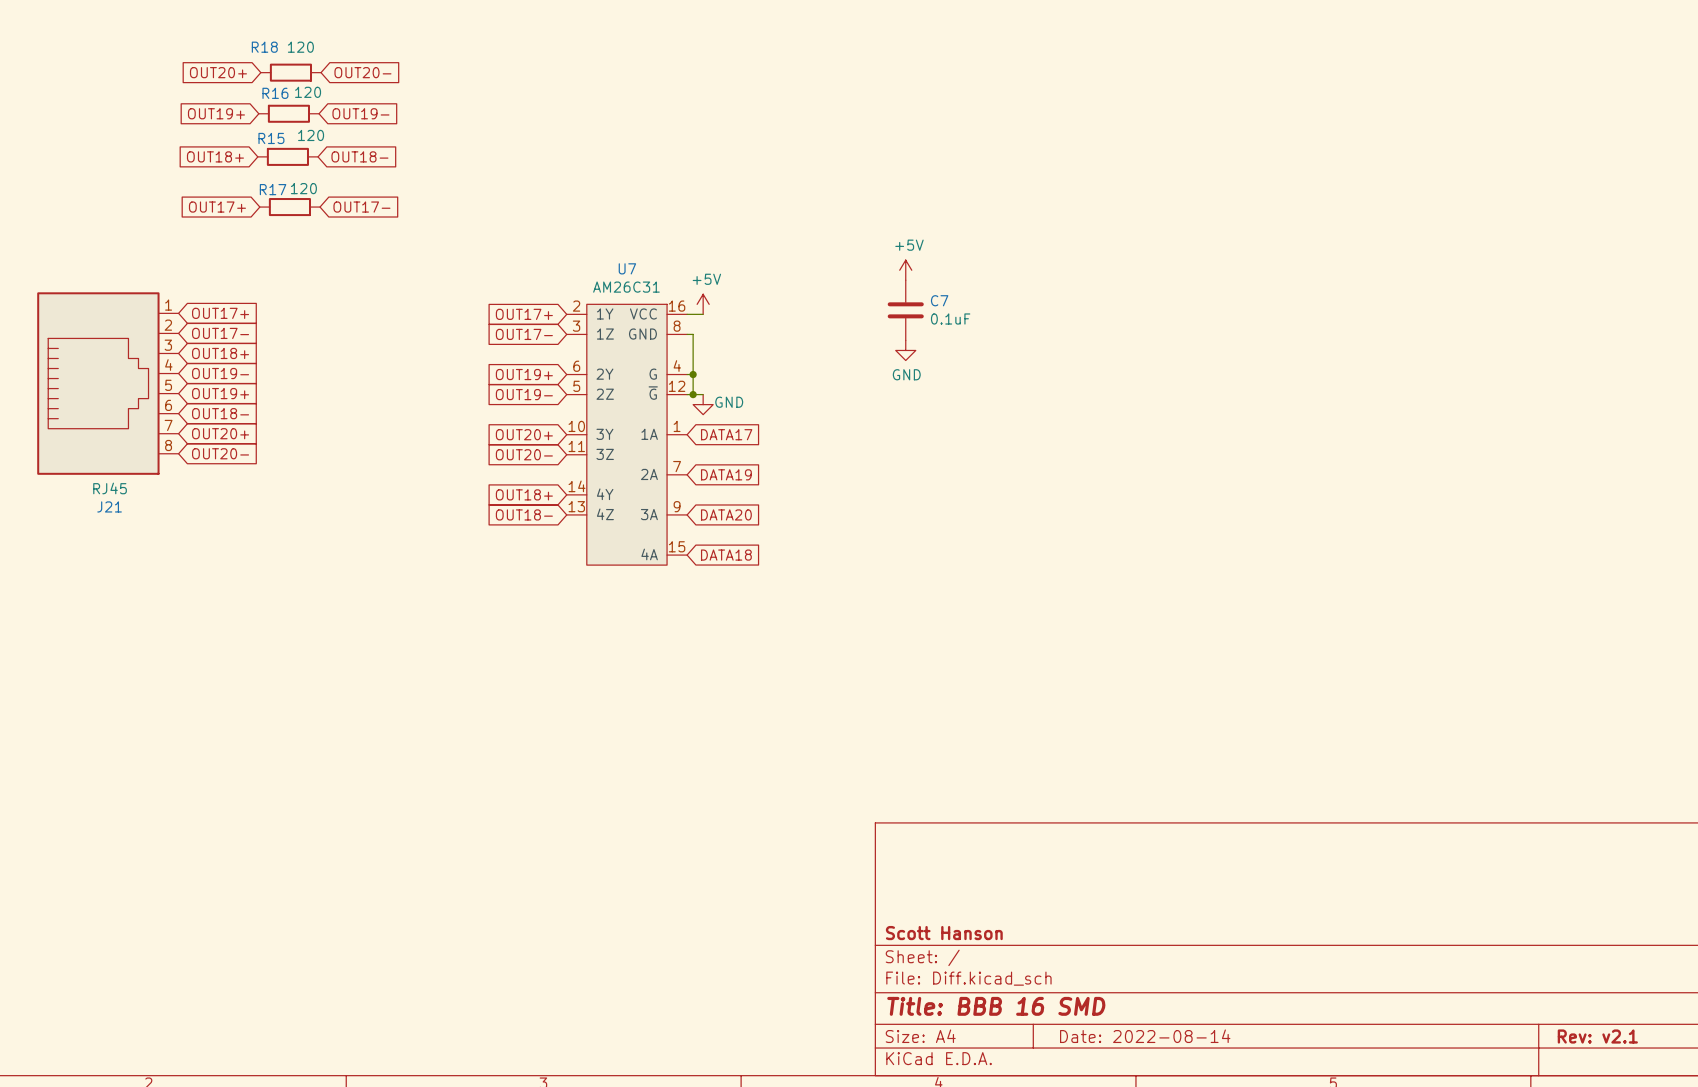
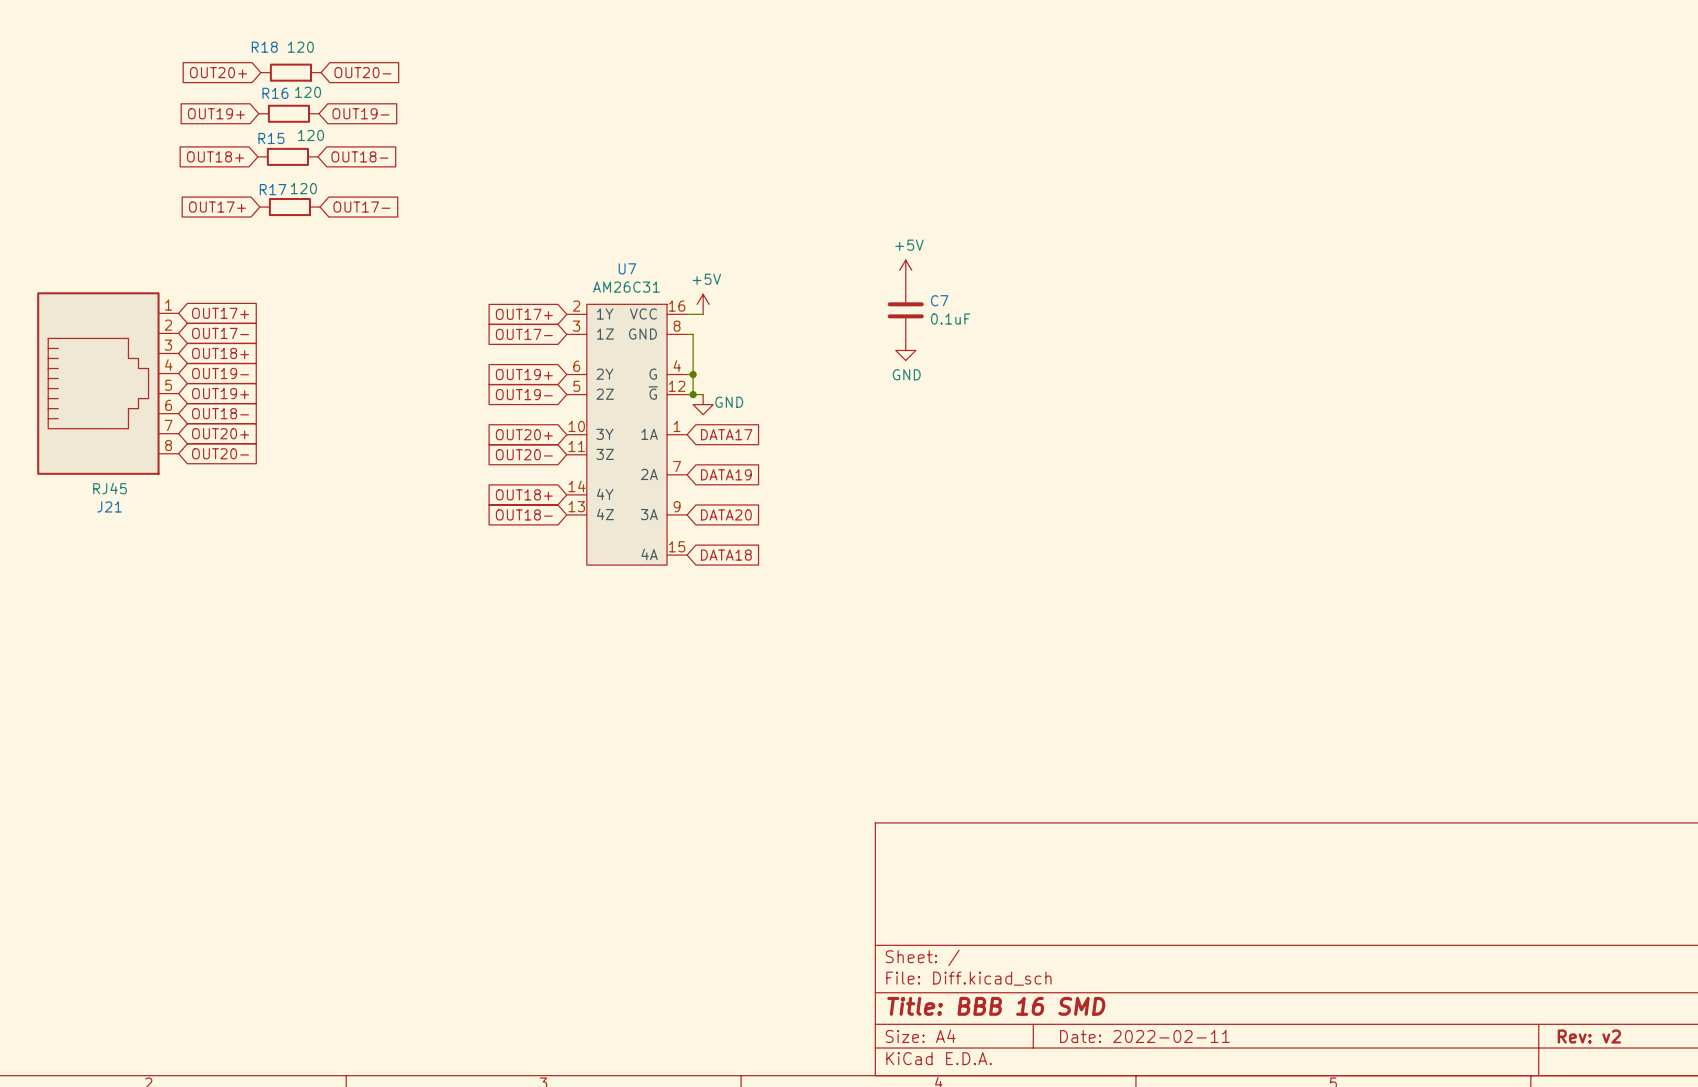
title block: Scott Hanson (944, 933) -> none
title block: Date: 2022-08-14 (1145, 1036) -> Date: 2022-02-11 (1144, 1036)
title block: Rev: v2.1 (1597, 1036) -> Rev: v2 (1589, 1036)

